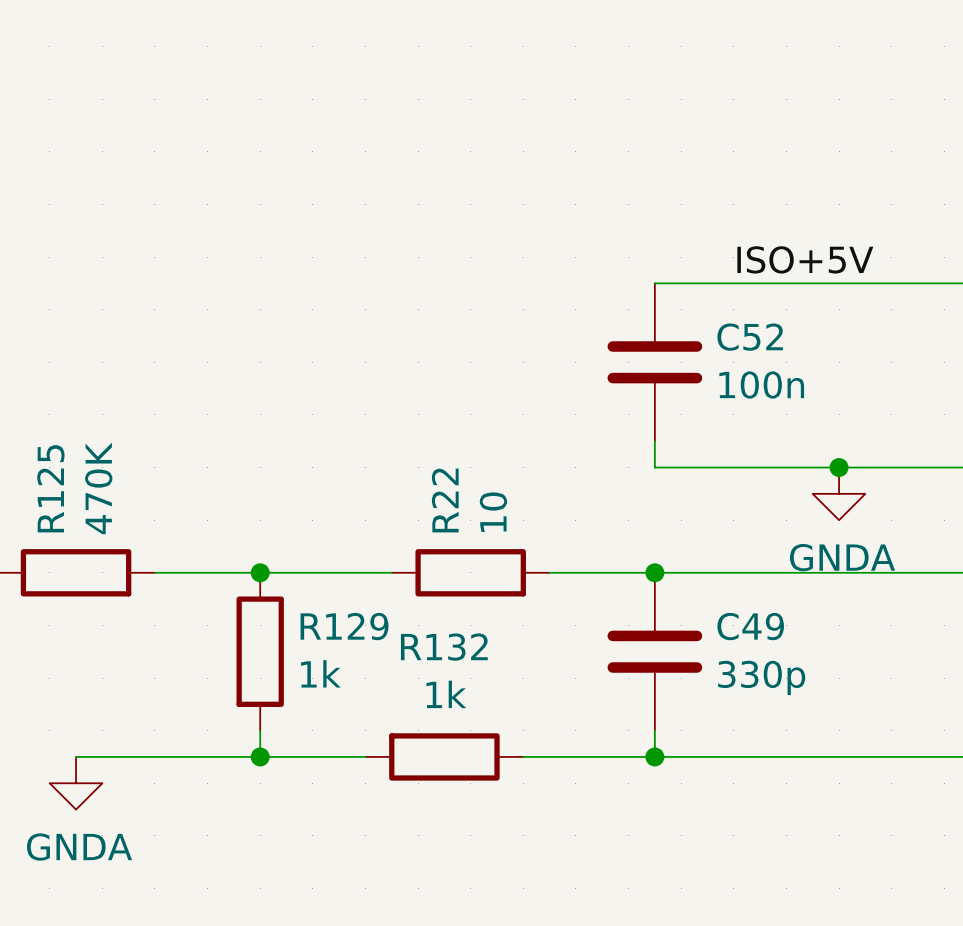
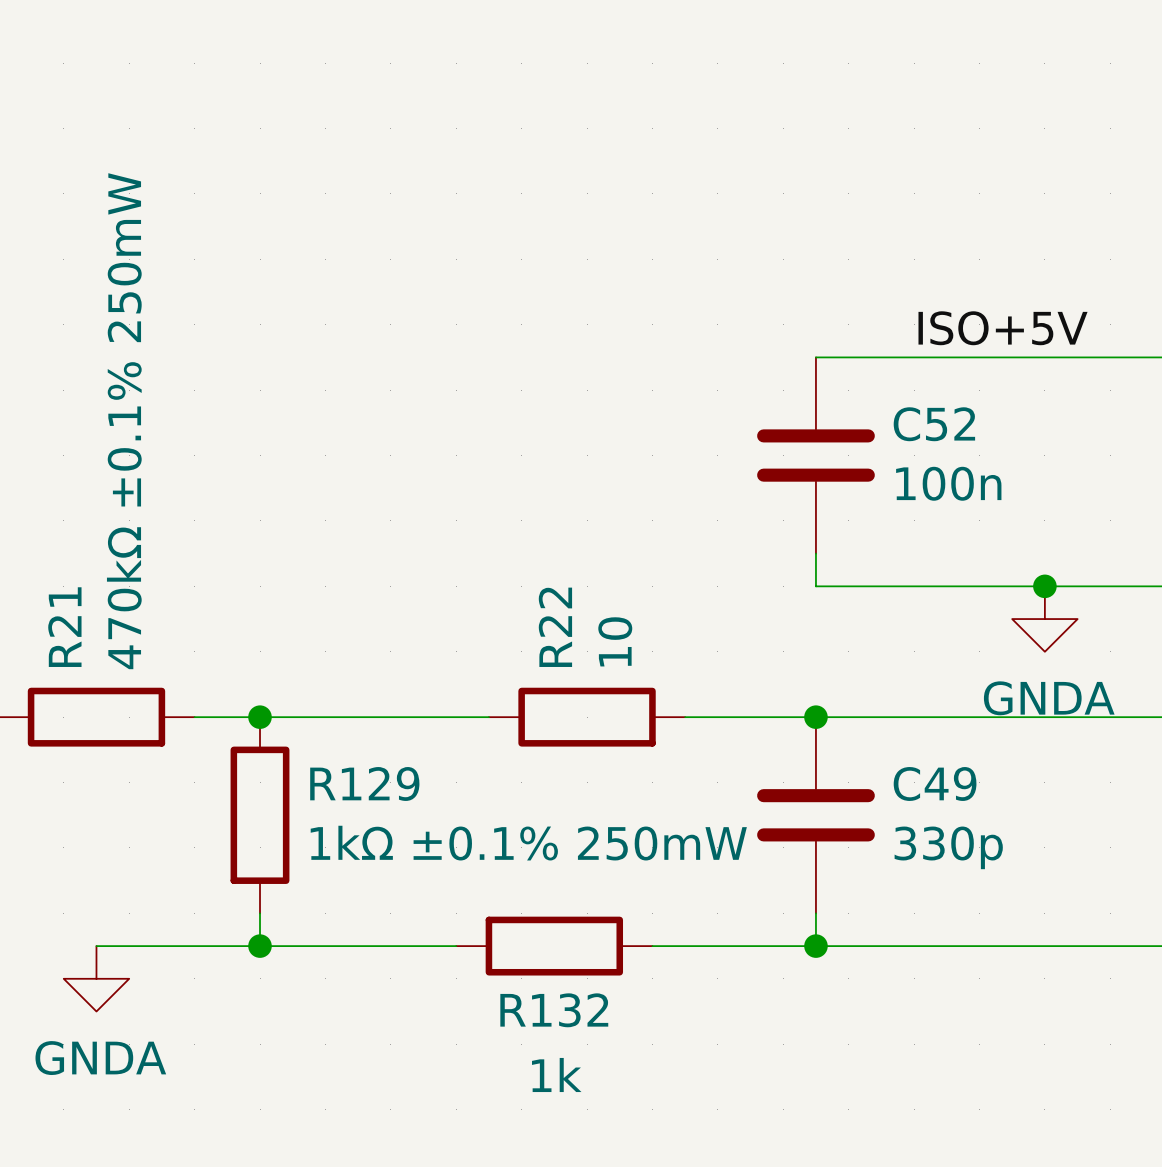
R125 name: R125 (50, 488) -> R21 (64, 627)
R125 value: 470K (98, 488) -> 470kΩ ±0.1% 250mW (124, 421)
junction position: (260, 572) -> (260, 717)
R132 name position: R132 (444, 647) -> R132 (554, 1010)
R129 position: (260, 651) -> (260, 815)
R129 value: 1k (320, 673) -> 1kΩ ±0.1% 250mW (528, 843)
R132 value position: 1k (446, 694) -> 1k (556, 1075)
wire: (260, 730) (260, 756) -> (260, 913) (260, 946)
junction position: (260, 756) -> (260, 946)

